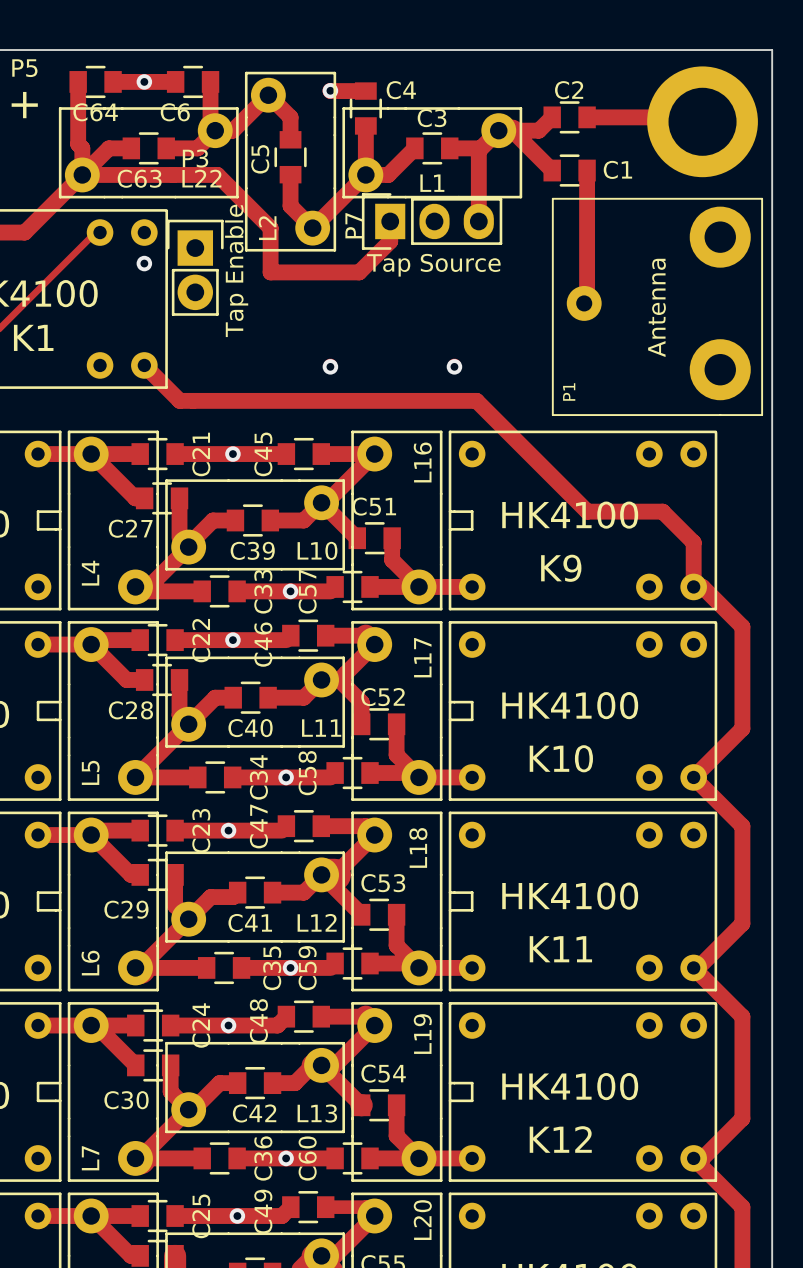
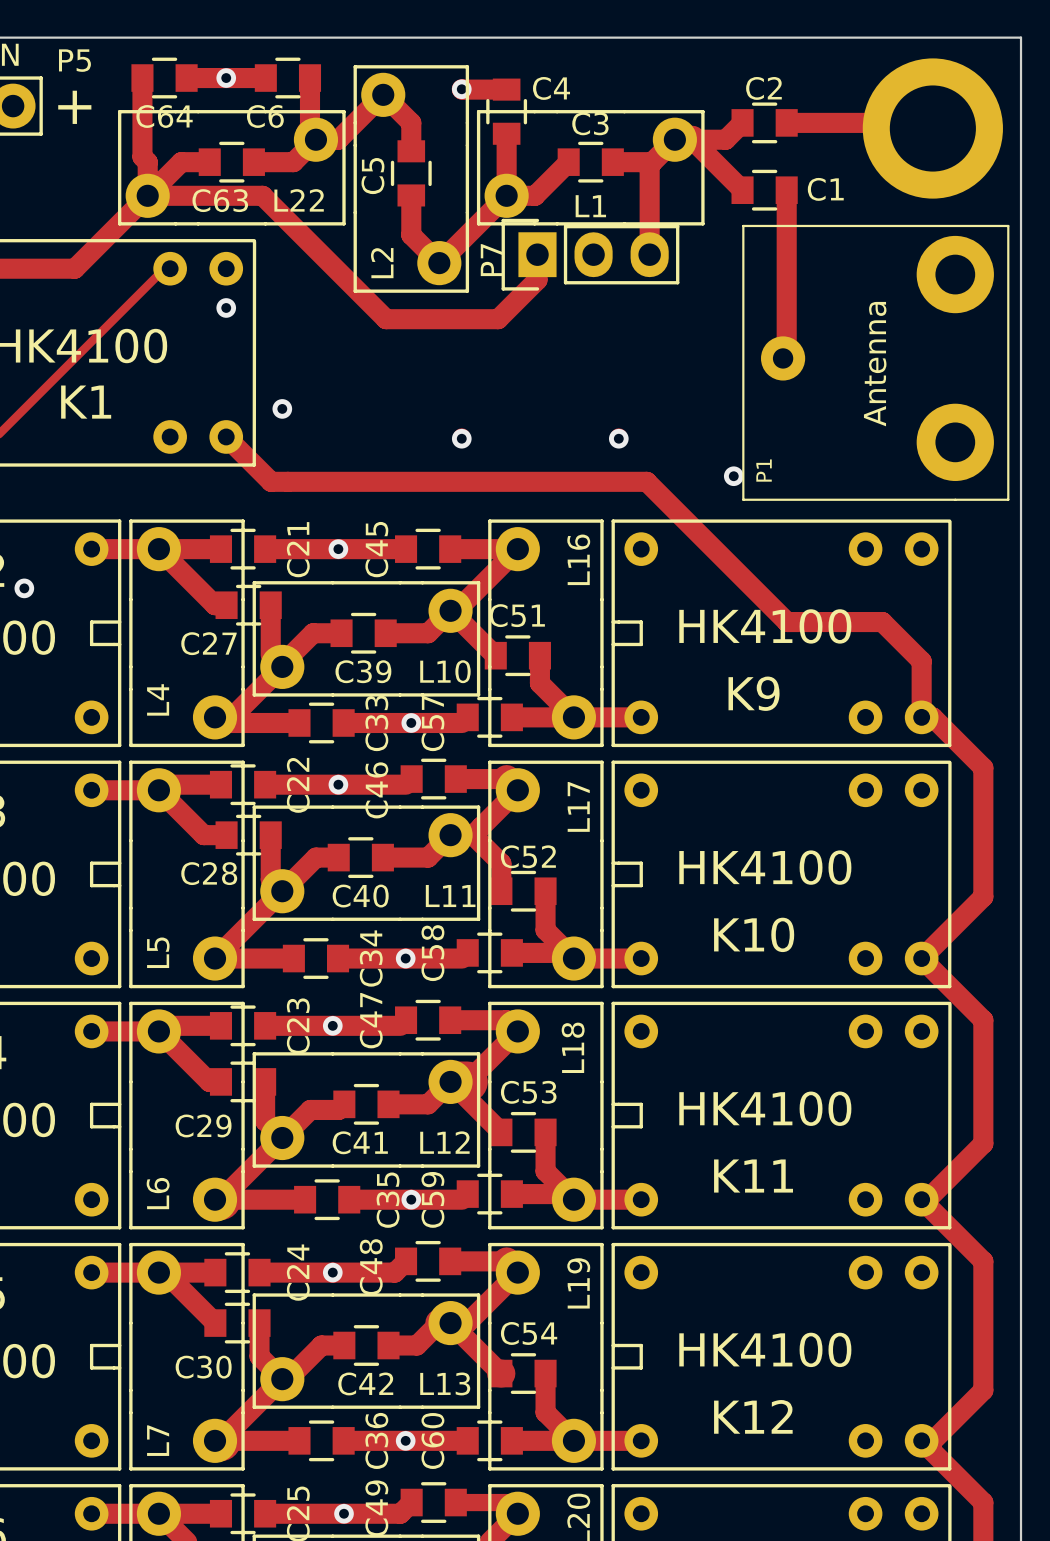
track: (173, 174) (217, 174) (270, 228) (270, 272) -> (262, 195) (386, 319)
P7 value: Tap Source (433, 265) -> none
P3: Tap Enable (195, 267) -> none
via: none -> (282, 408)
via: none -> (733, 476)

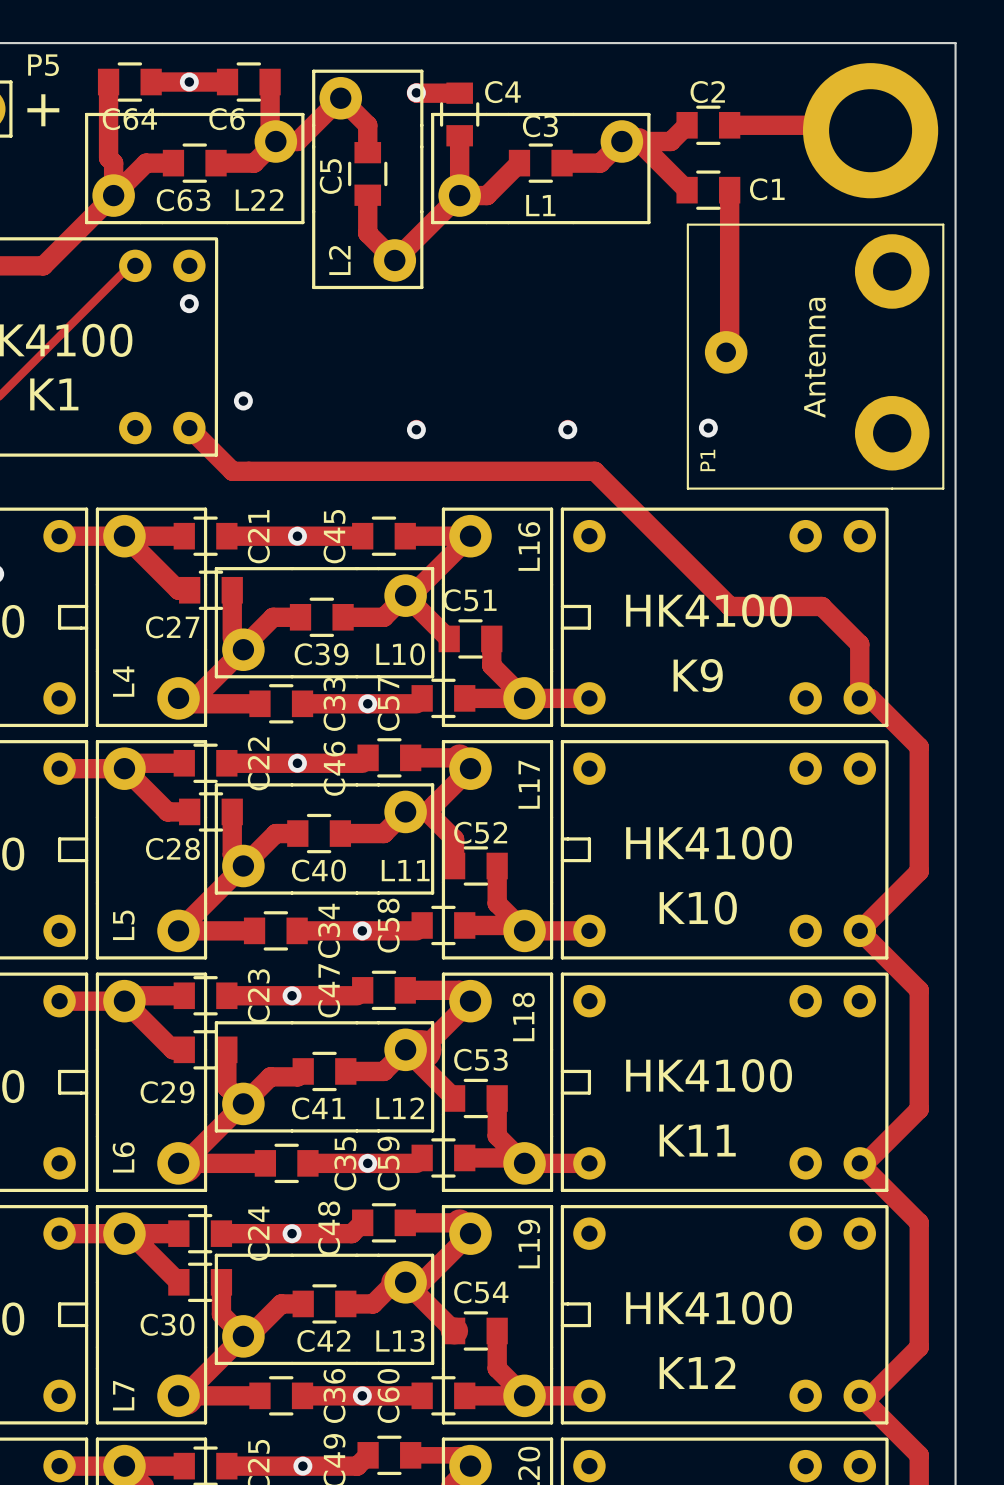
track: (652, 162) (649, 164) (649, 254) -> none
track: (147, 195) (262, 195) (386, 319) (498, 319) (537, 279) (537, 254) -> none
P7: (590, 254) -> none
via position: (733, 476) -> (708, 428)

